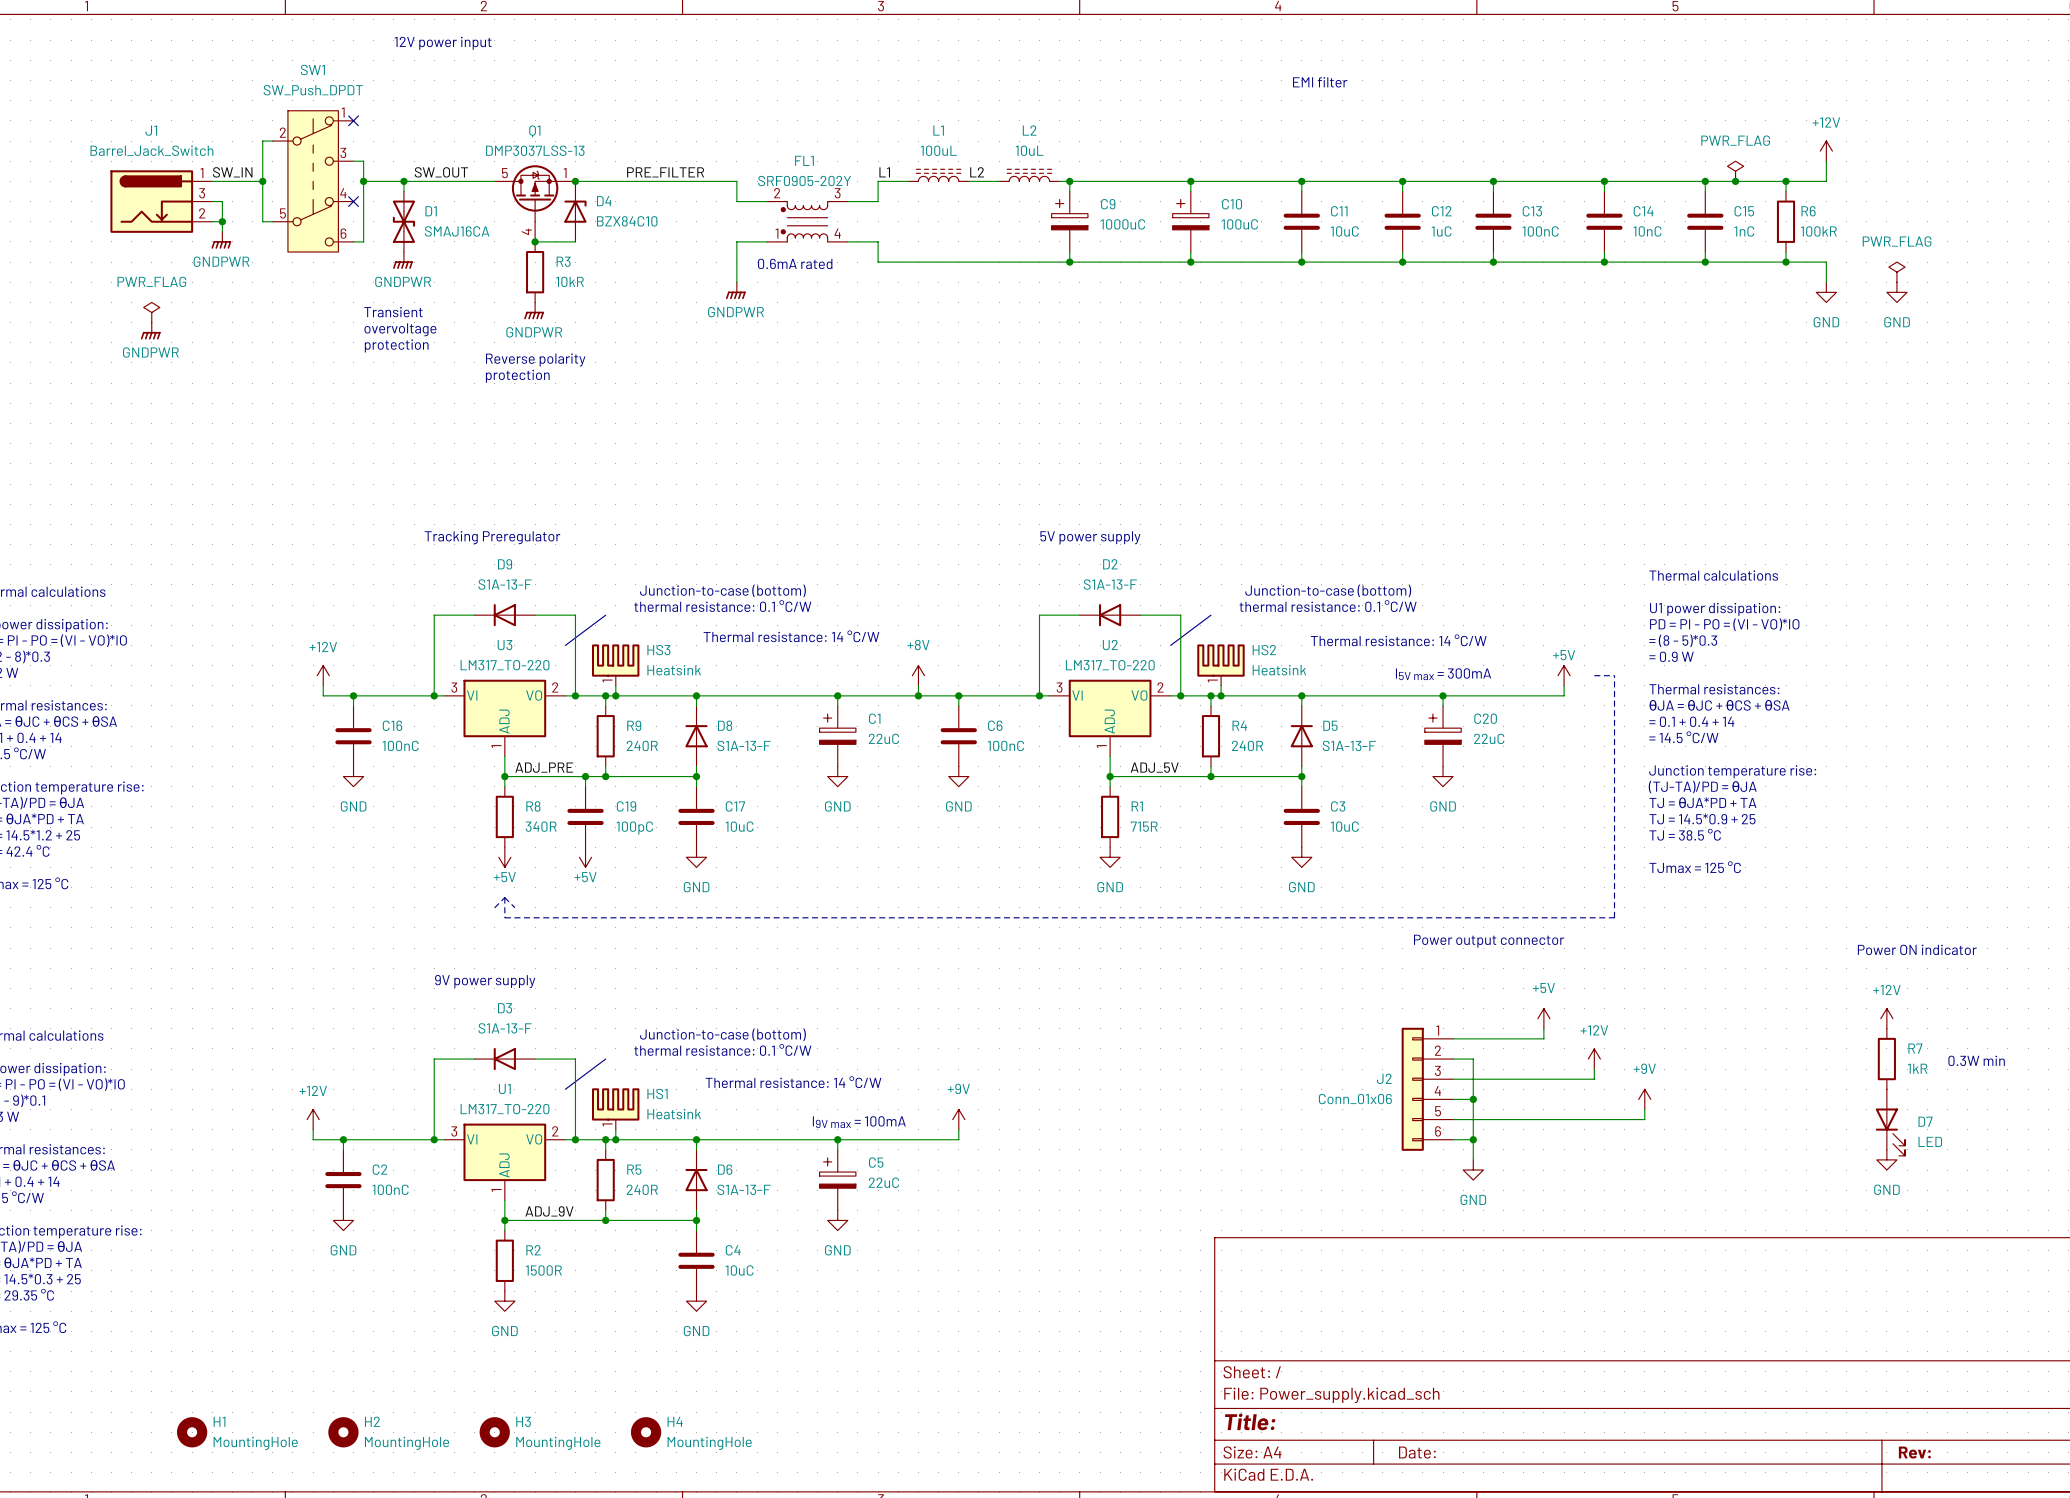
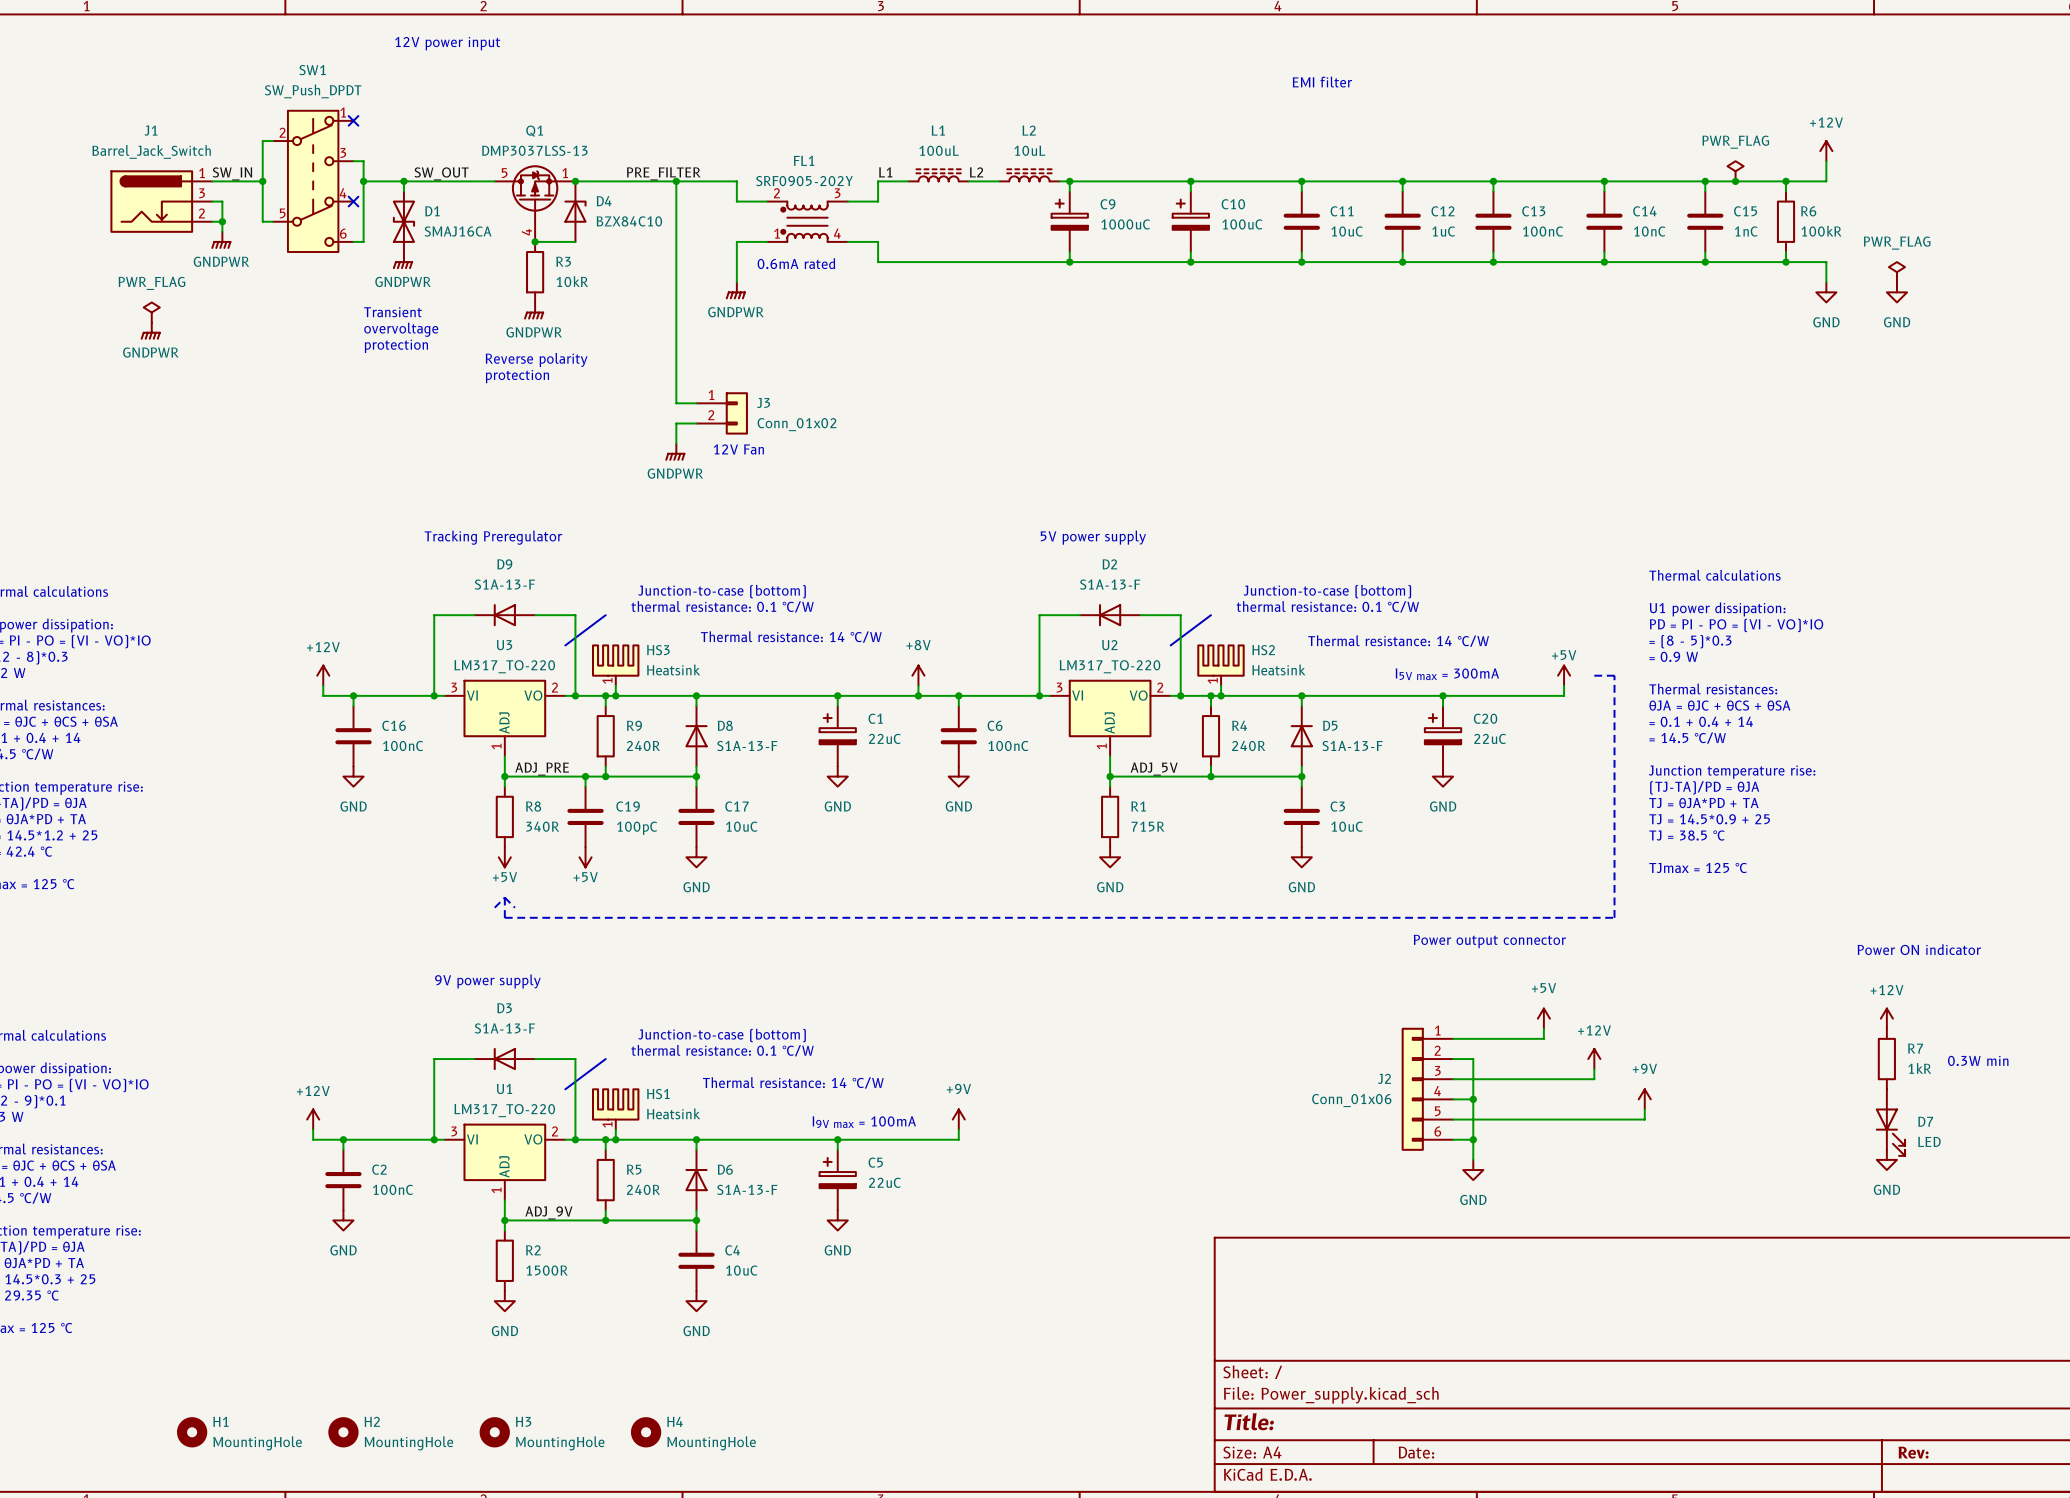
wire: none -> (676, 181) (676, 403) (696, 403)
junction: none -> (676, 181)
J3: none -> Conn_01x02 (722, 413)
wire: none -> (696, 423) (676, 423) (676, 443)
text: none -> 12V Fan (738, 449)
power symbol: none -> GNDPWR (675, 452)

